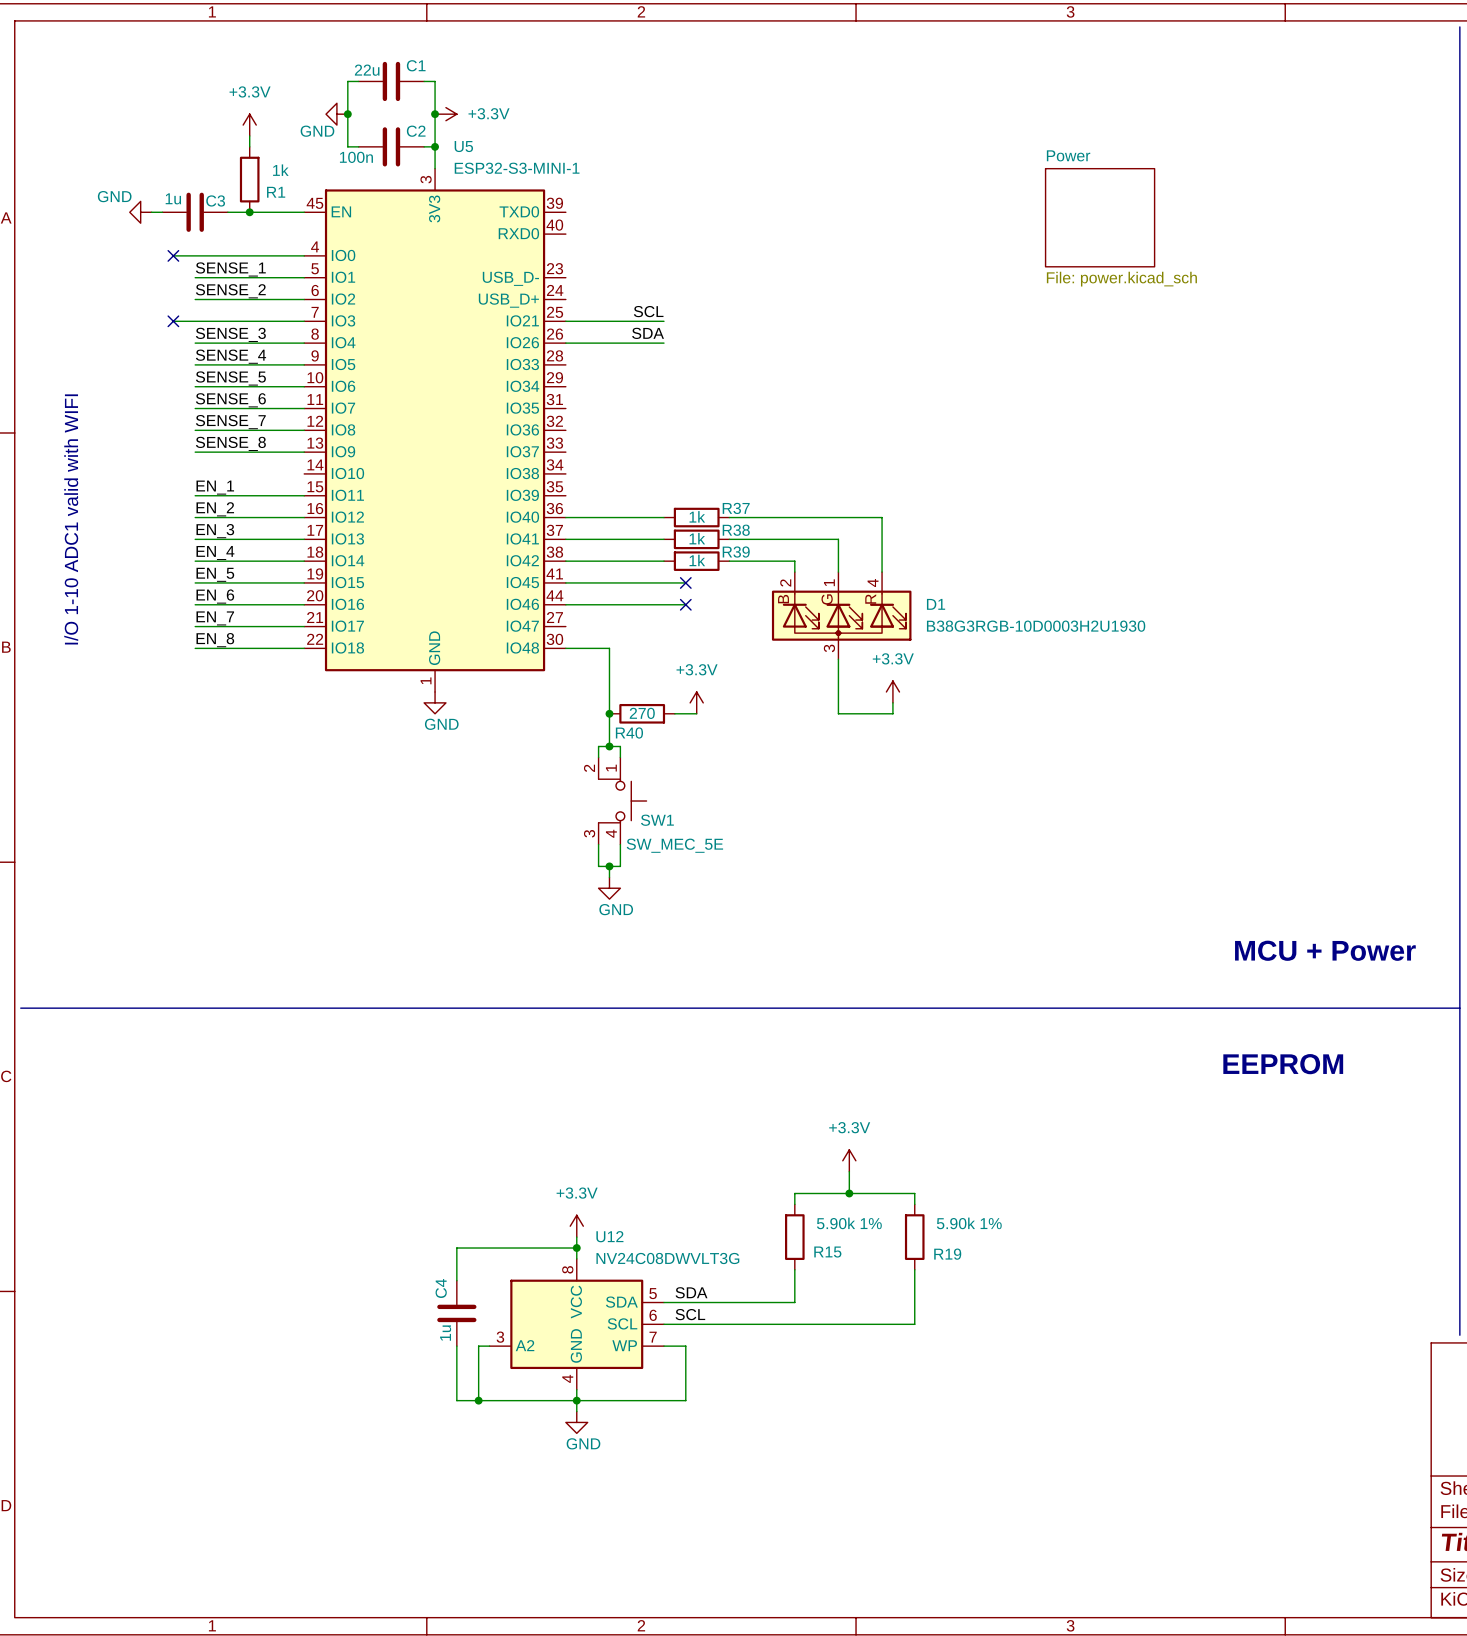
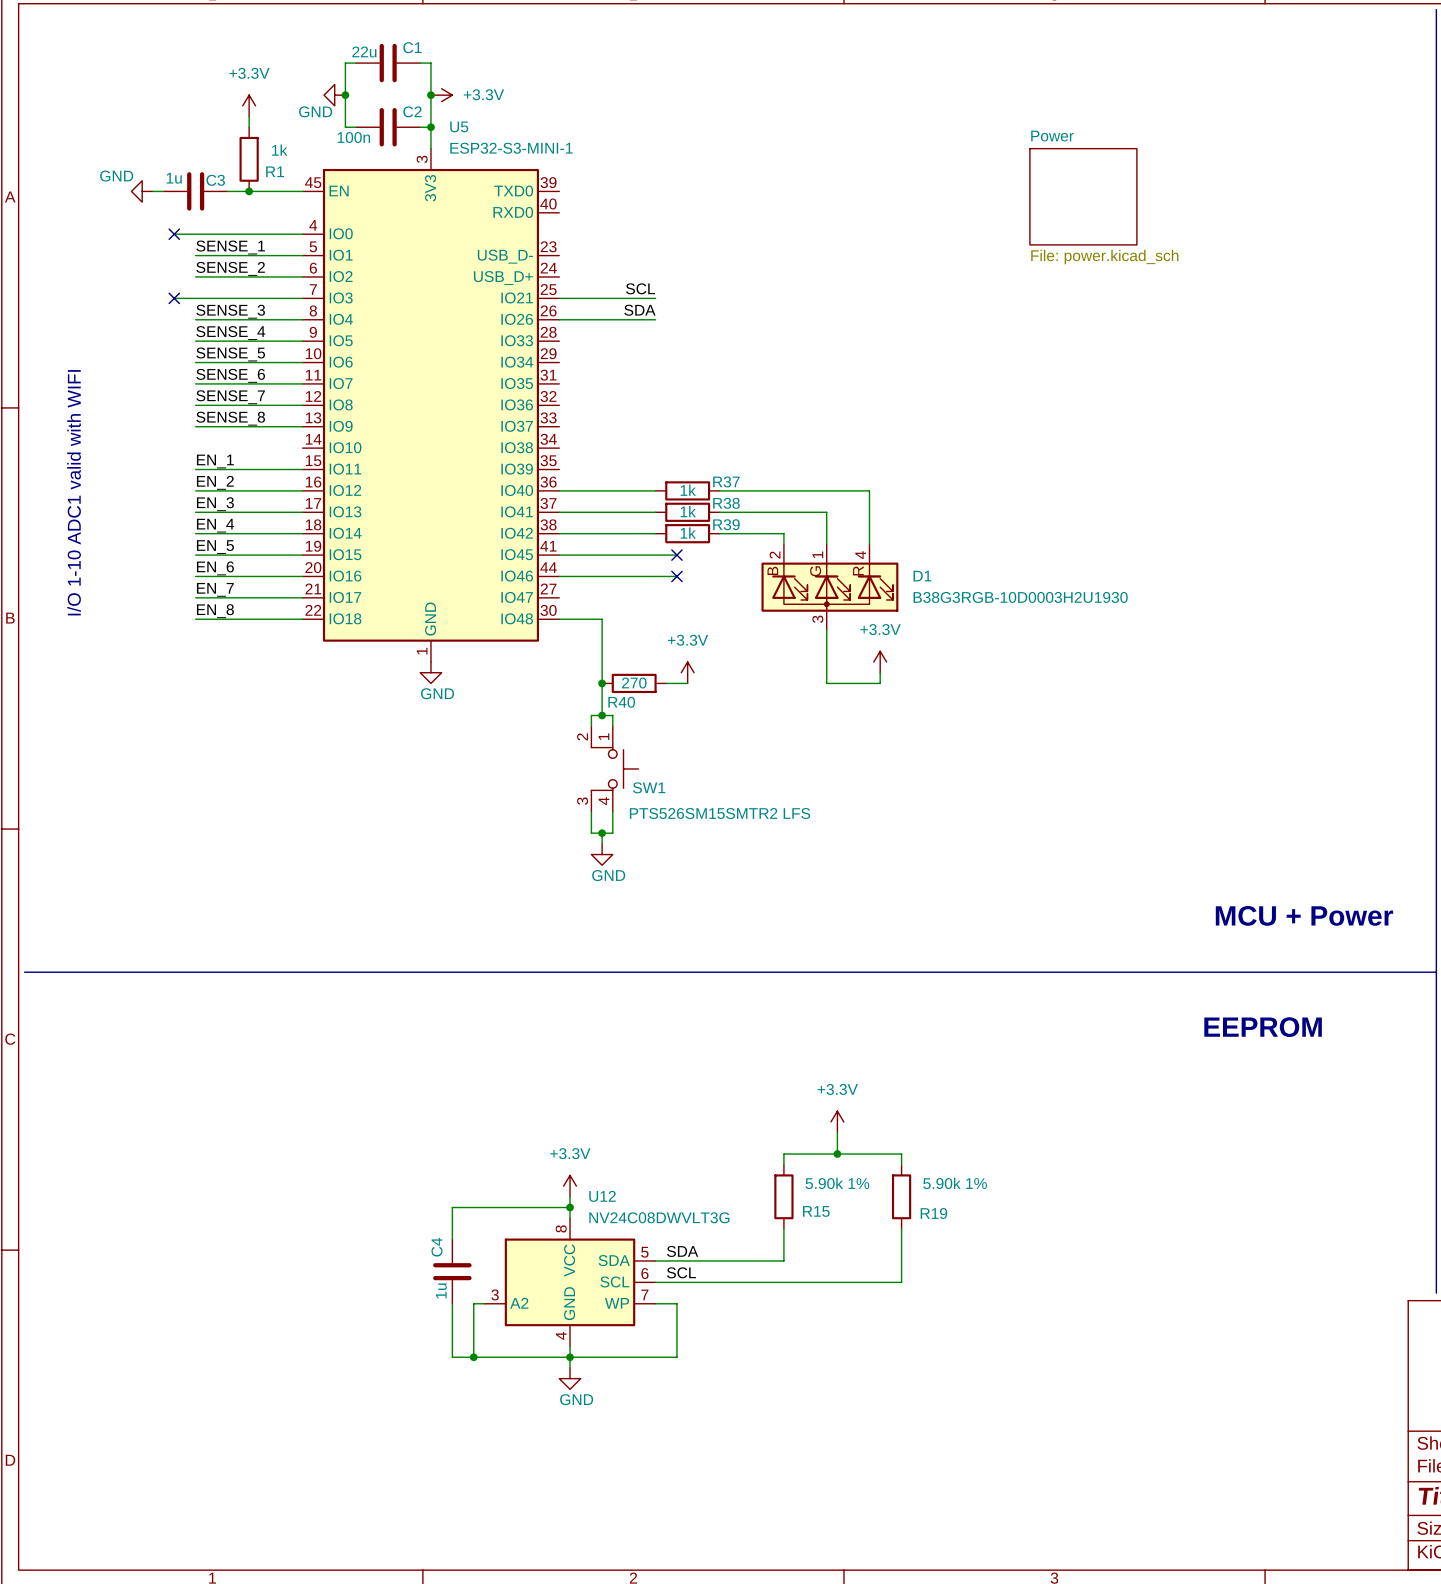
SW1 value: SW_MEC_5E (674, 845) -> PTS526SM15SMTR2 LFS (720, 813)

